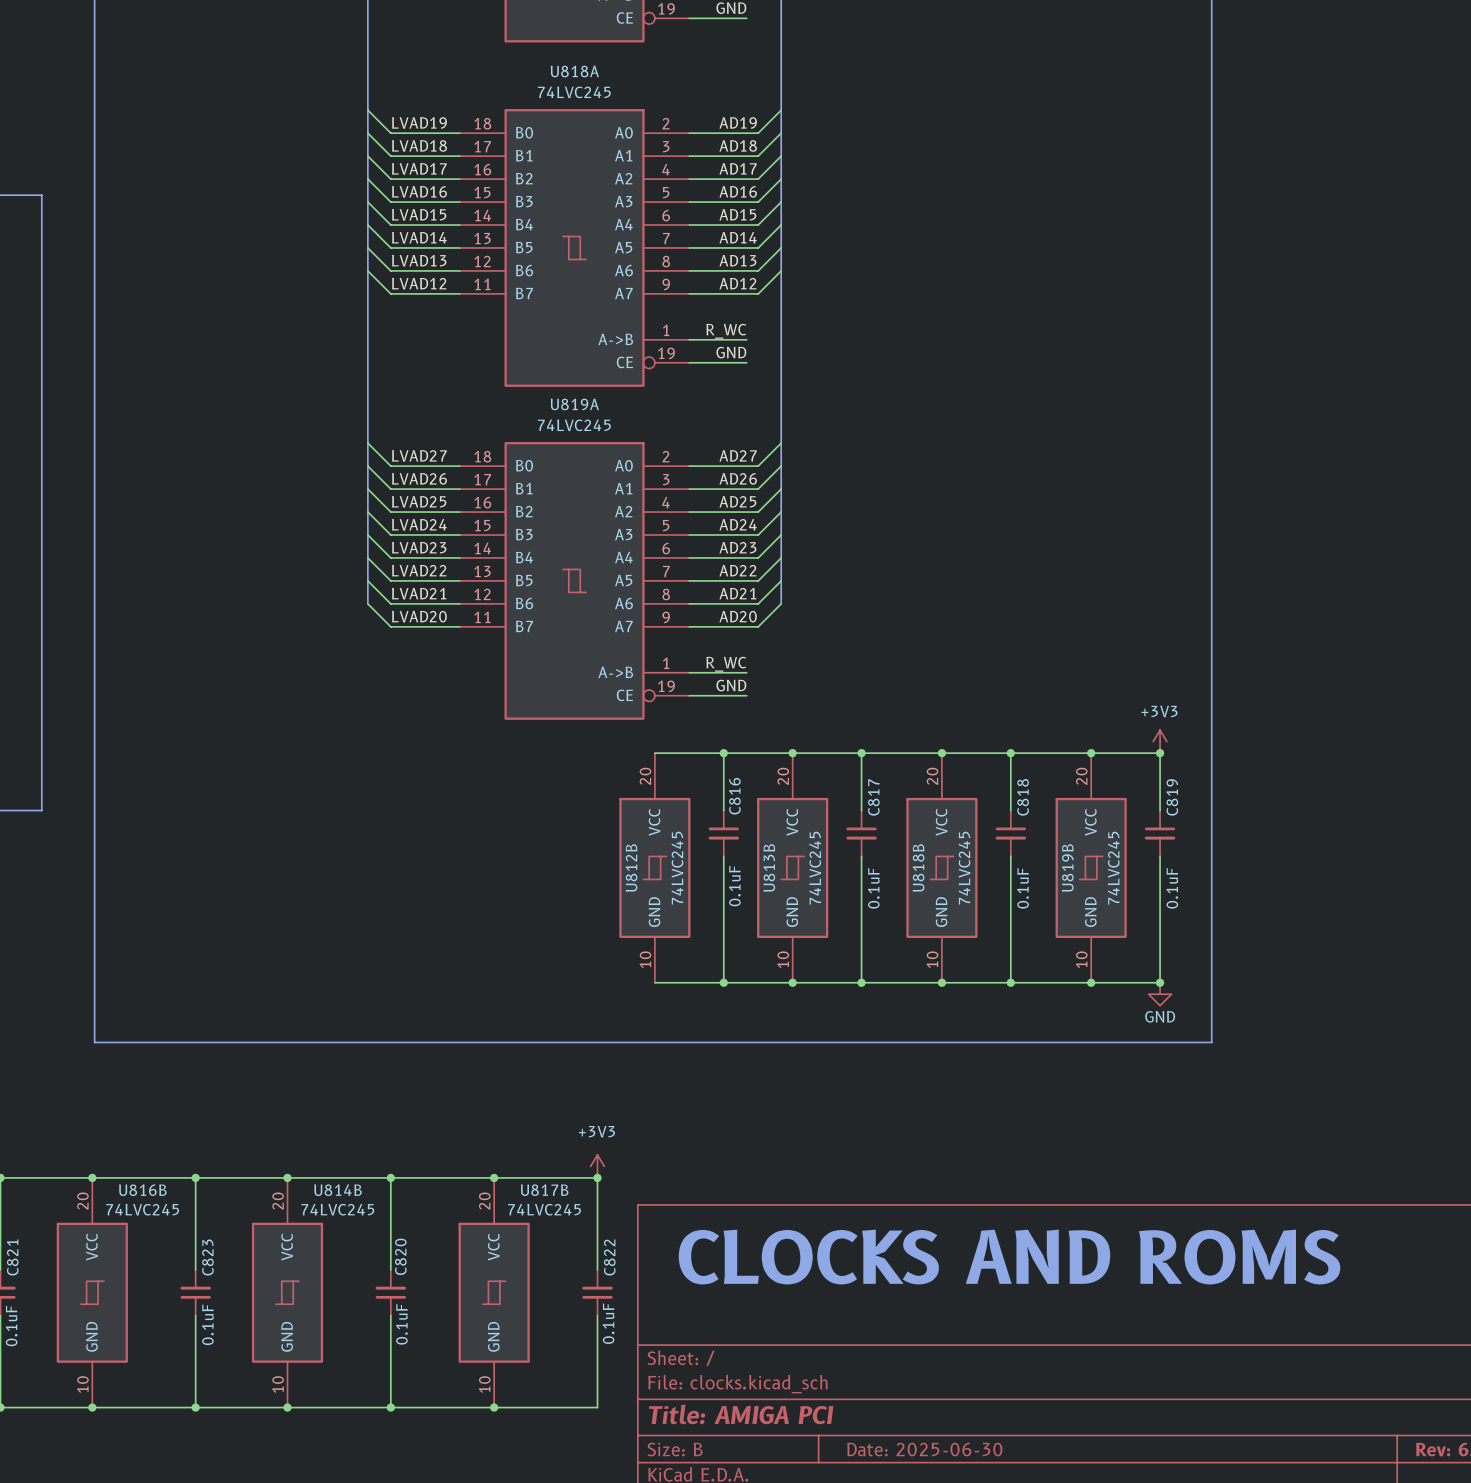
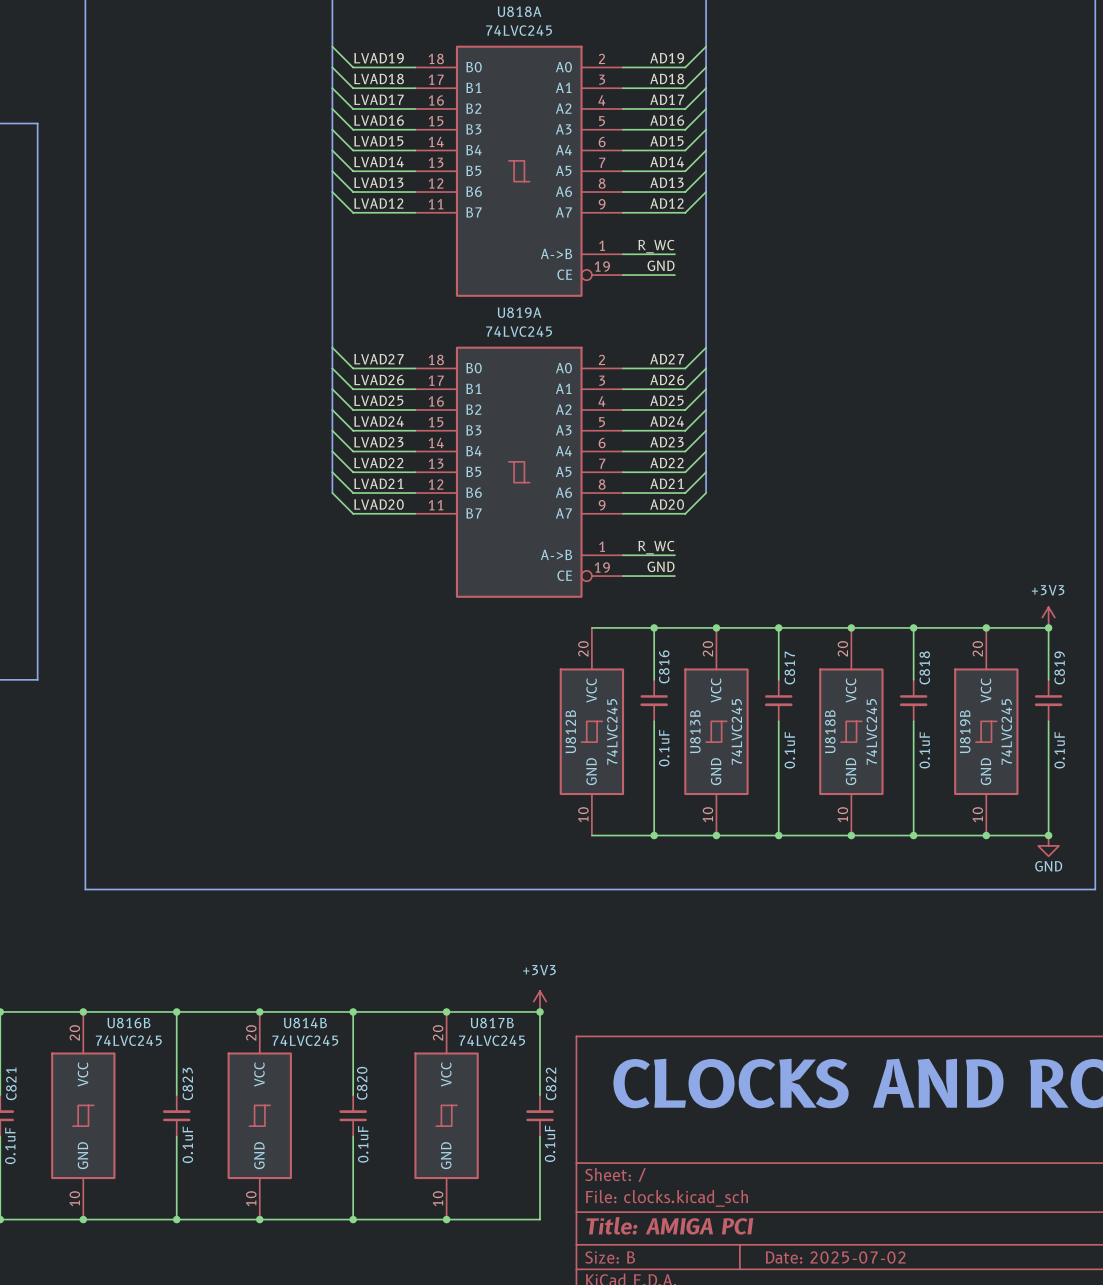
title block: Date: 2025-06-30 (924, 1449) -> Date: 2025-07-02 (835, 1257)

